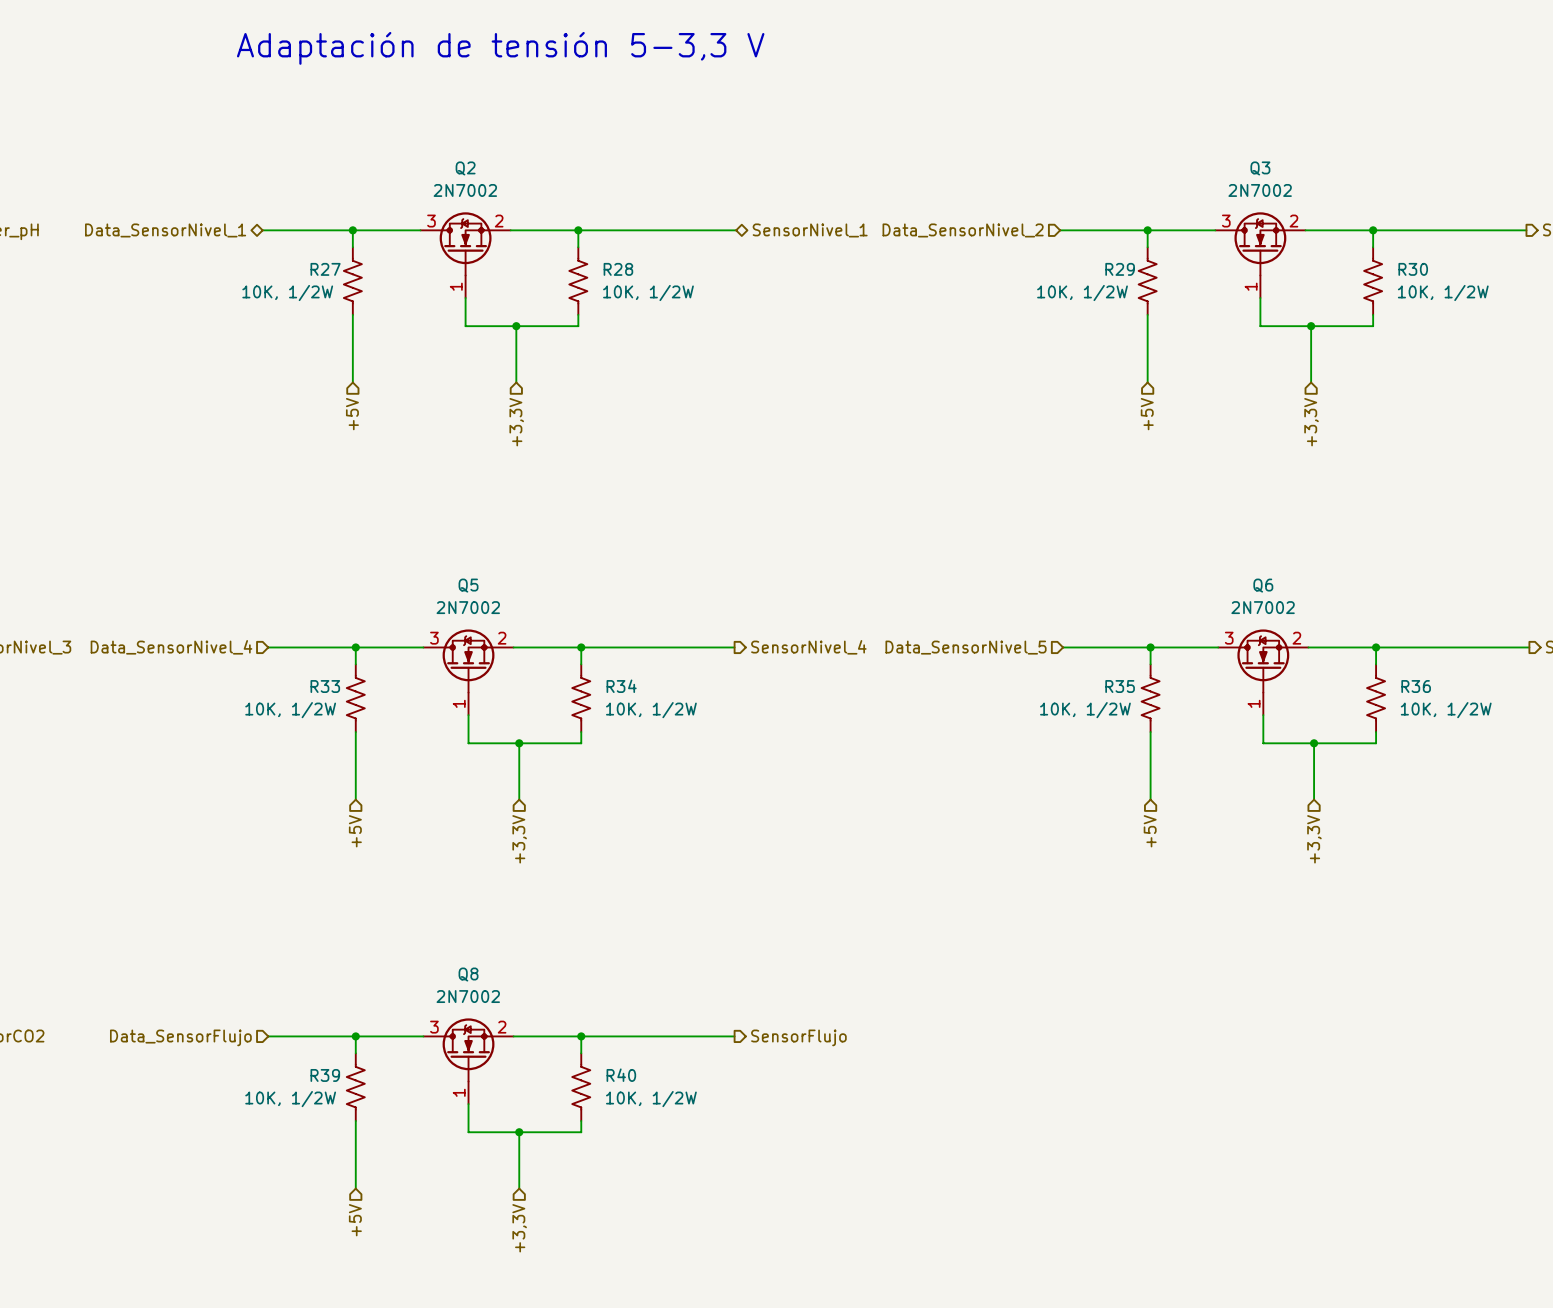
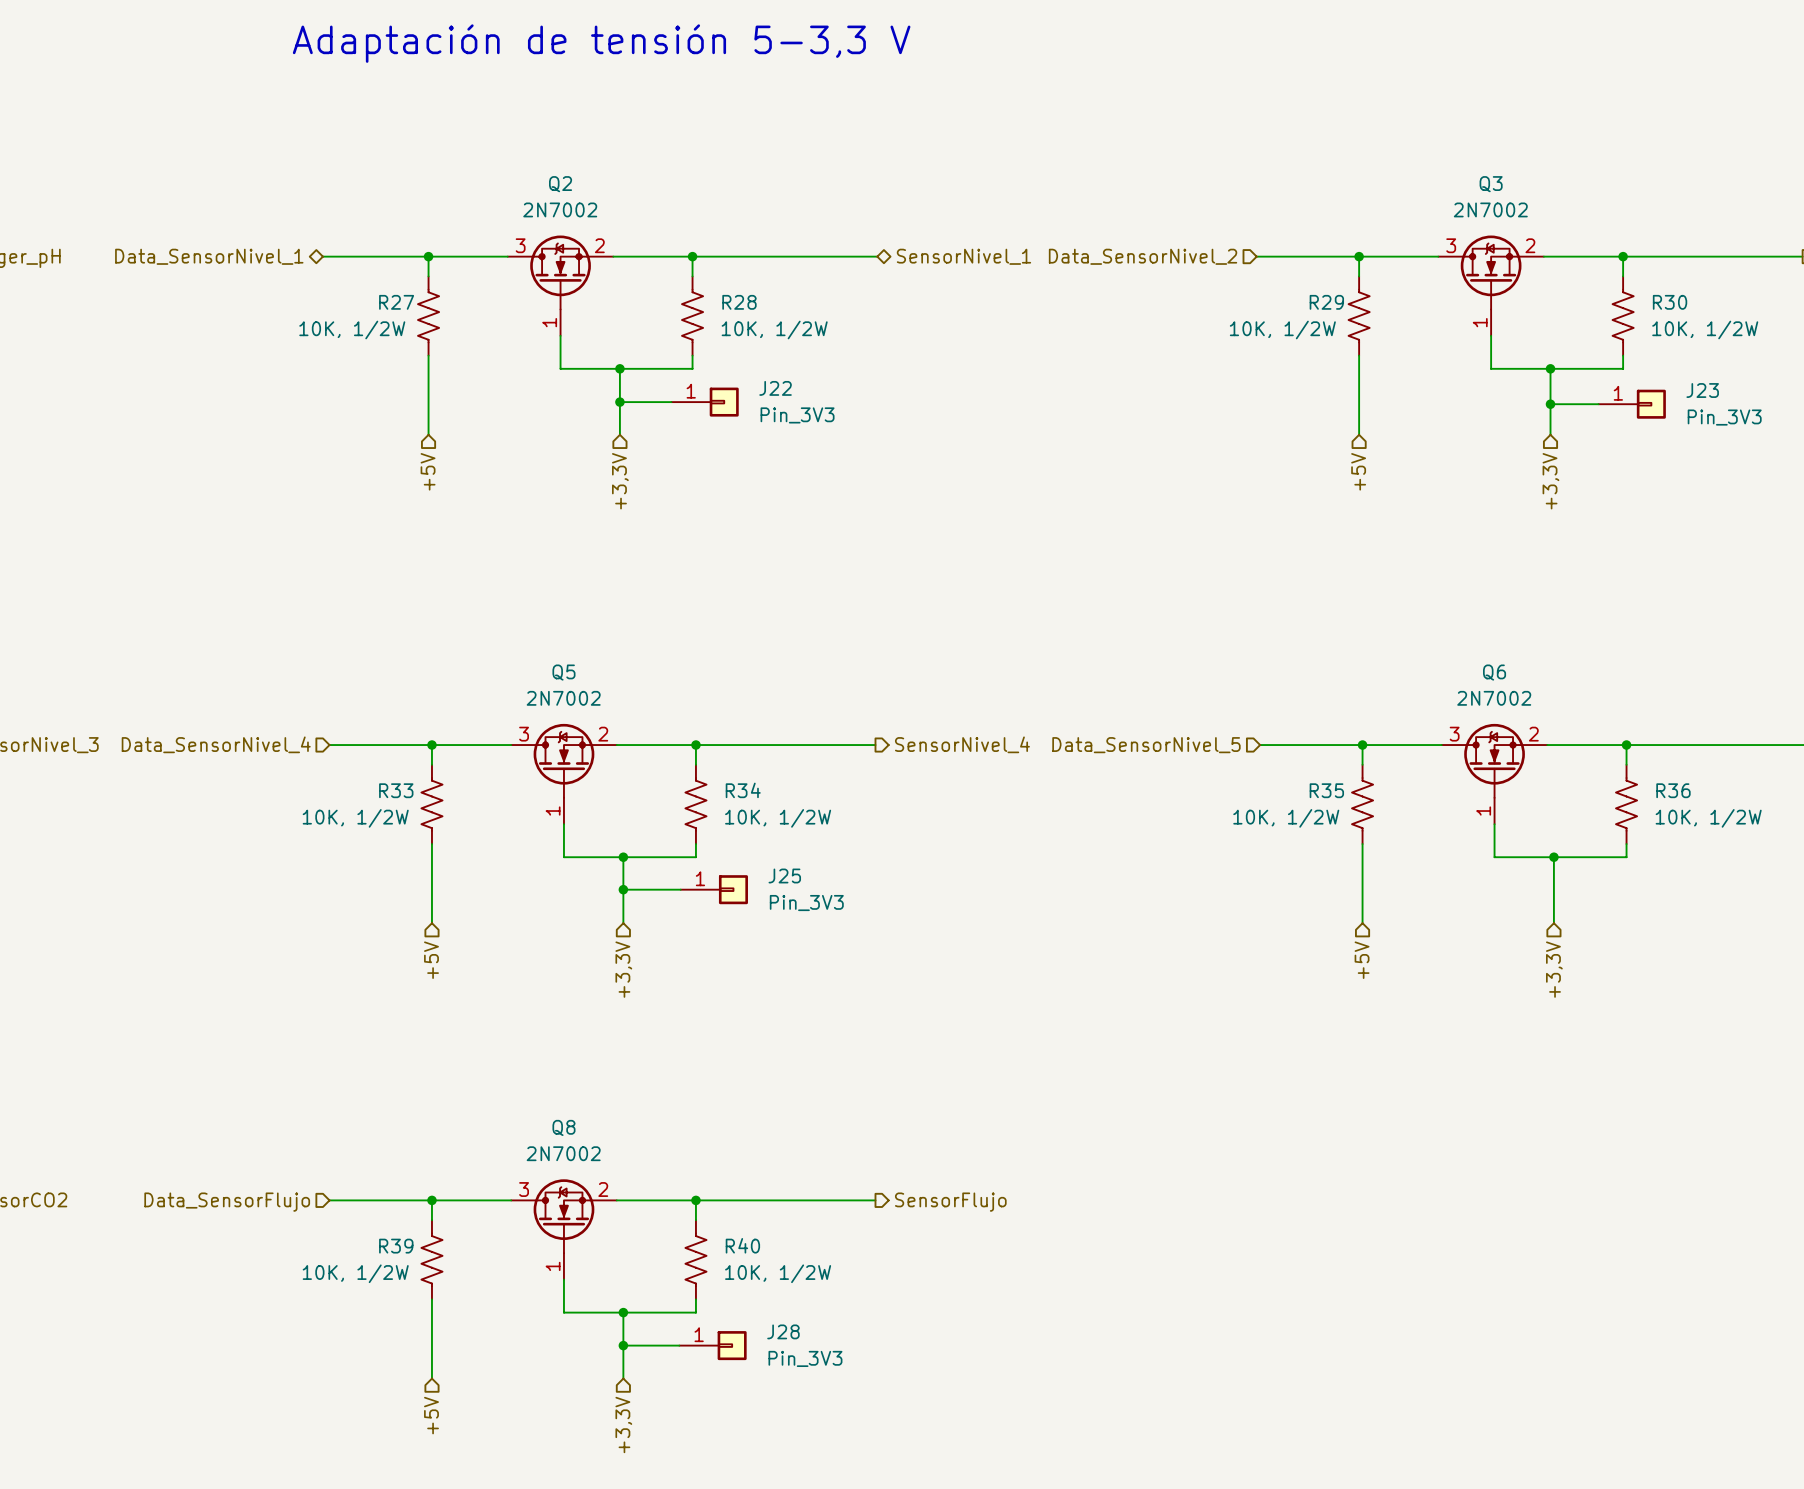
wire: none -> (619, 402) (671, 402)
junction: none -> (619, 402)
J22: none -> Pin_3V3 (705, 402)
wire: none -> (1550, 404) (1598, 404)
junction: none -> (1550, 404)
J23: none -> Pin_3V3 (1632, 404)
wire: none -> (623, 889) (680, 889)
junction: none -> (623, 889)
J25: none -> Pin_3V3 (714, 889)
wire: none -> (623, 1345) (679, 1345)
junction: none -> (623, 1345)
J28: none -> Pin_3V3 (713, 1345)

